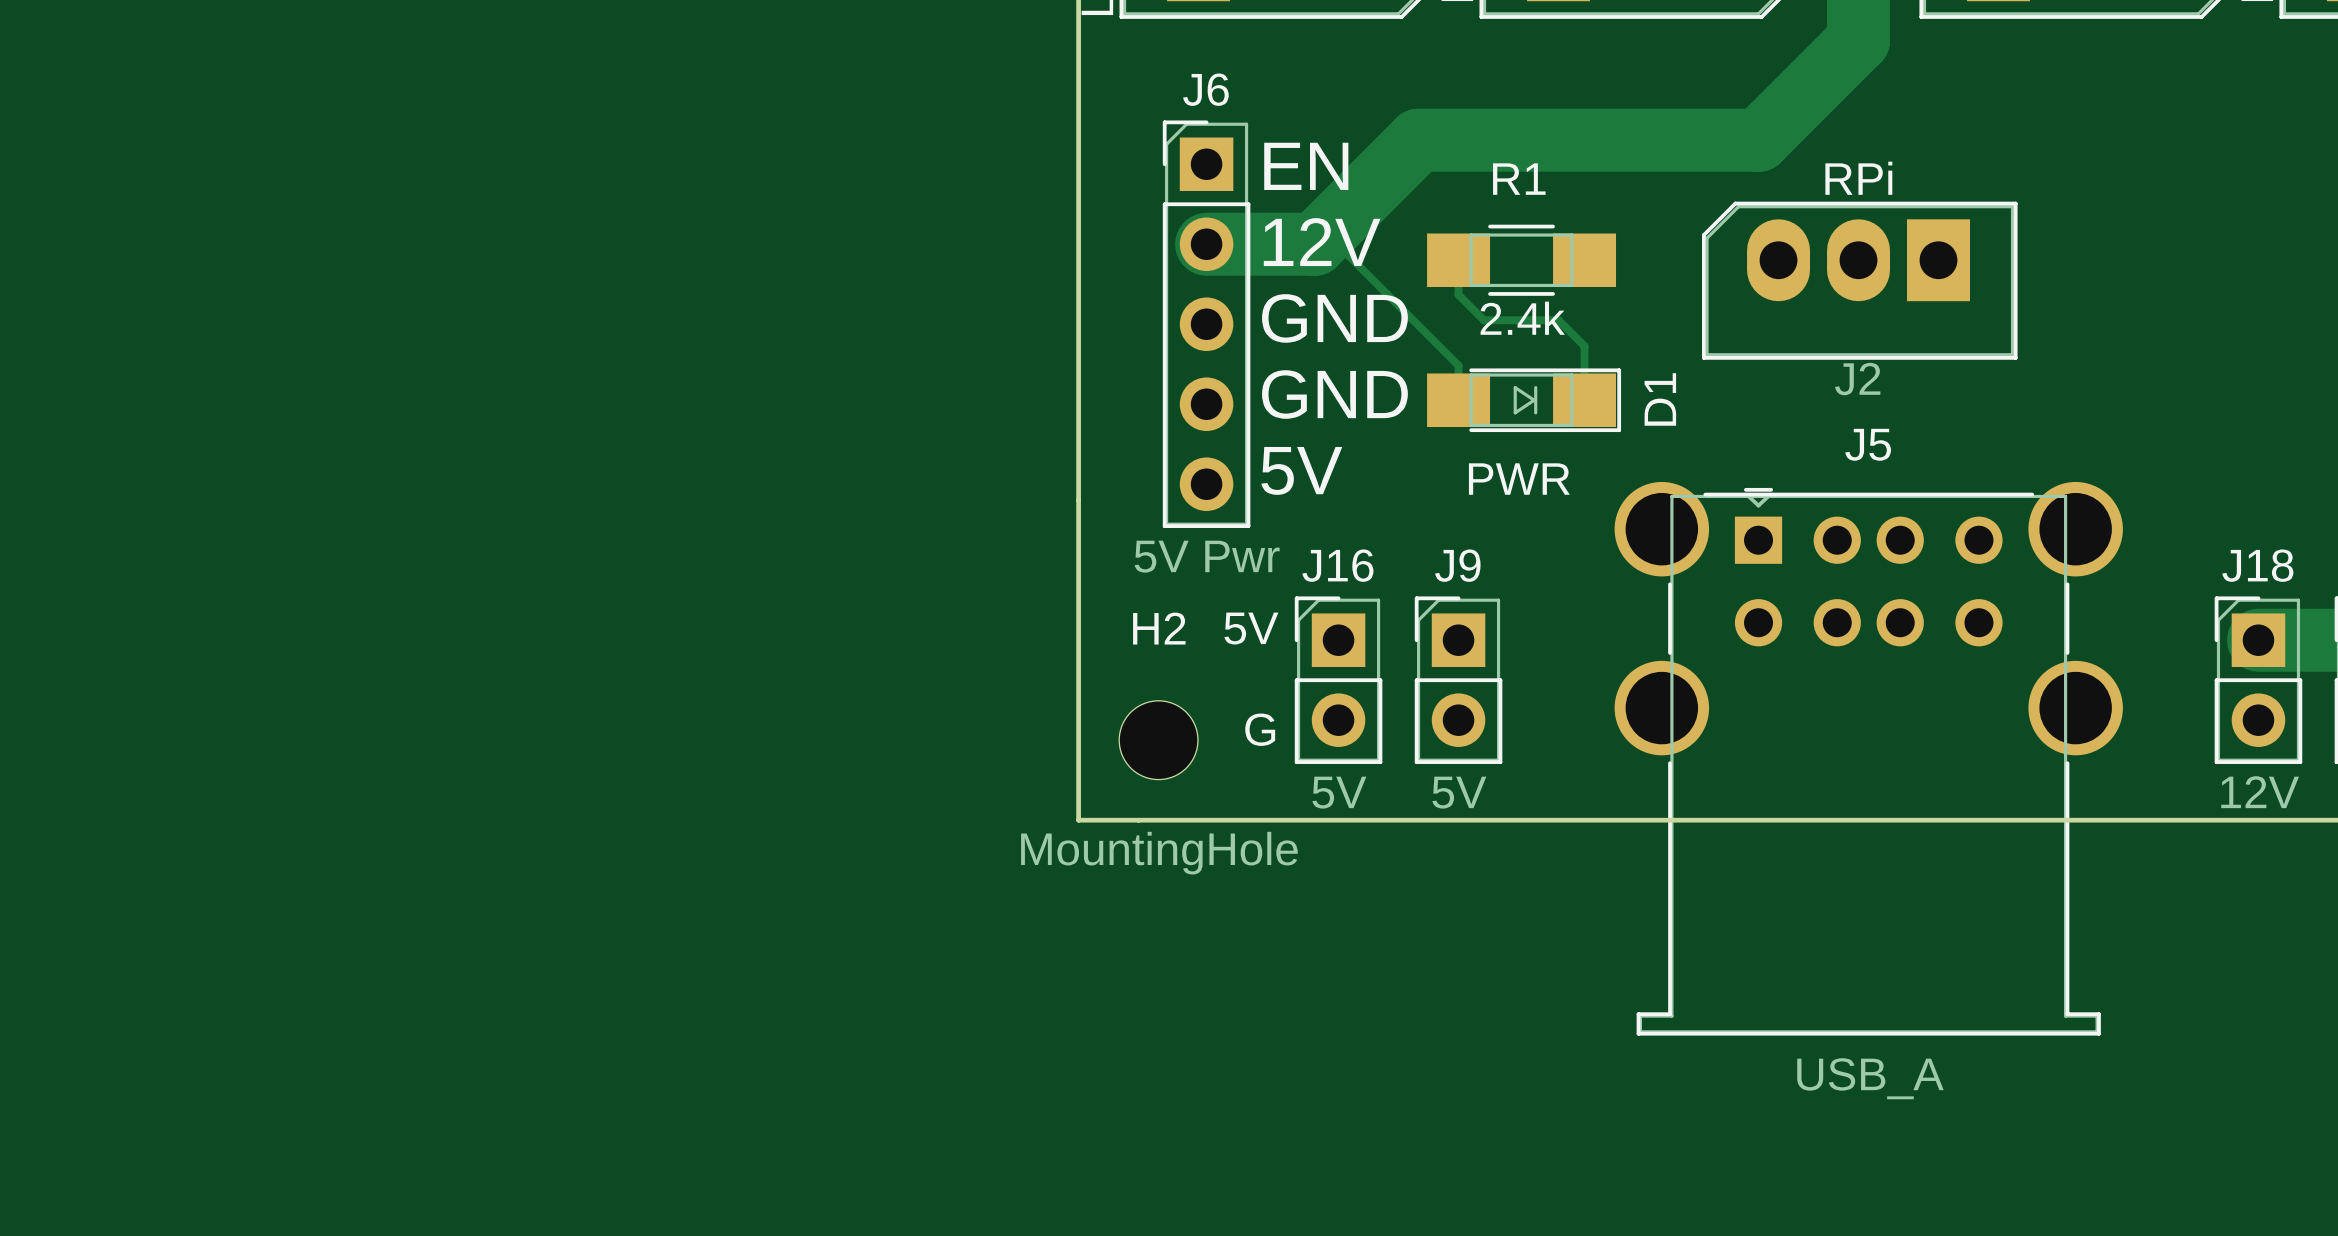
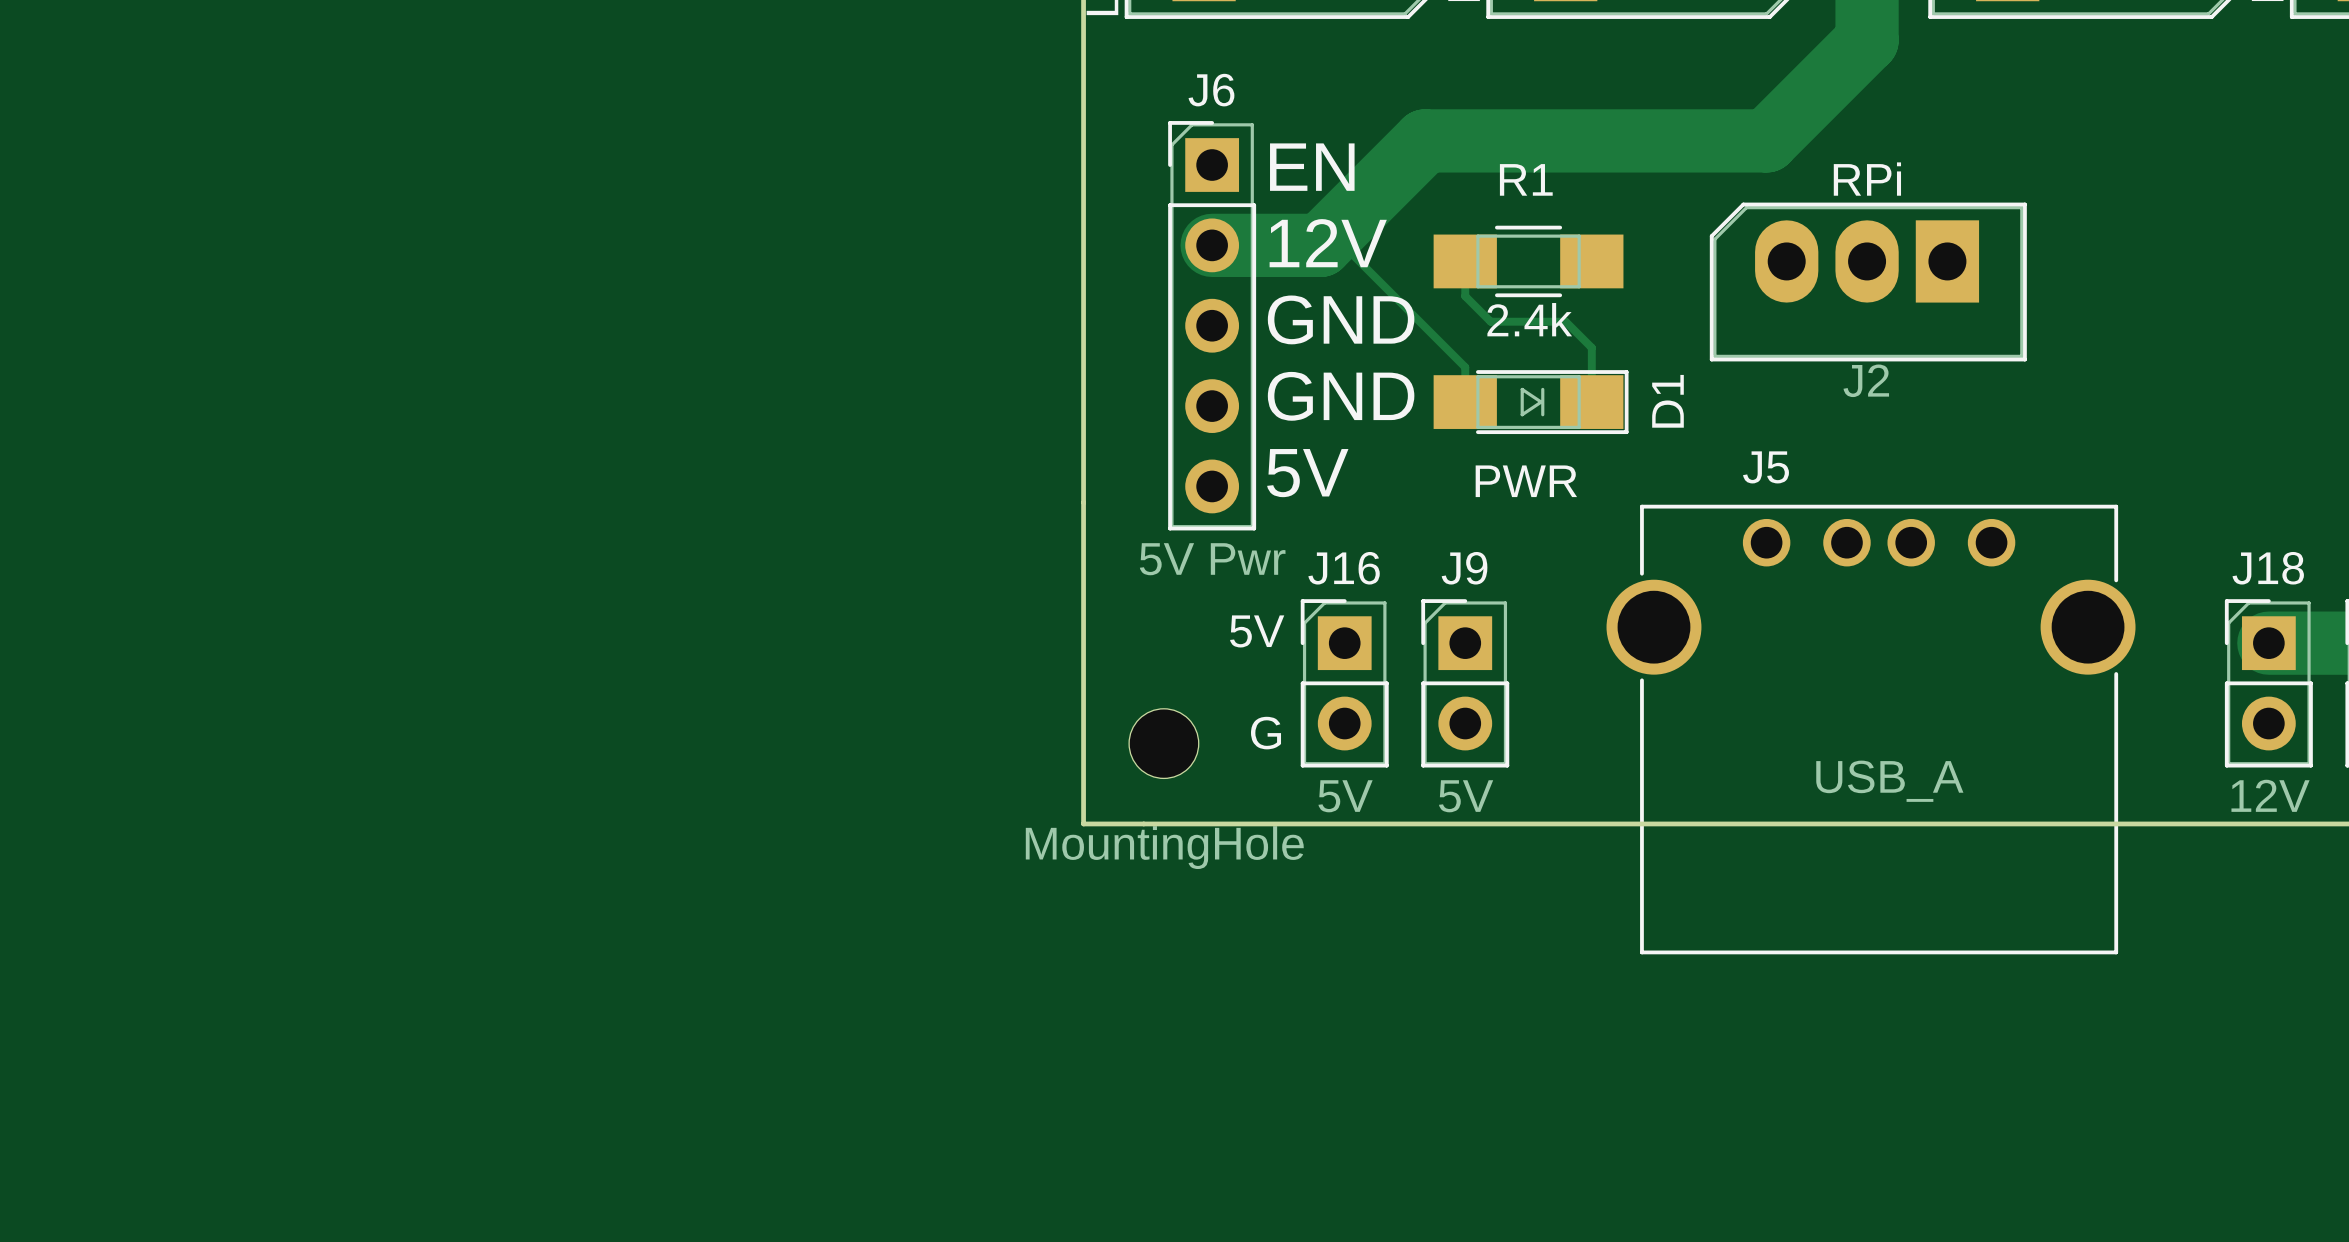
J5 name position: J5 (1868, 444) -> J5 (1766, 467)
J5 footprint: [1614, 481, 2123, 1036] -> [1606, 504, 2136, 955]
H2: MountingHole (1158, 740) -> none
part: none -> MountingHole (1163, 743)
J5 value position: USB_A (1870, 1078) -> USB_A (1889, 781)

